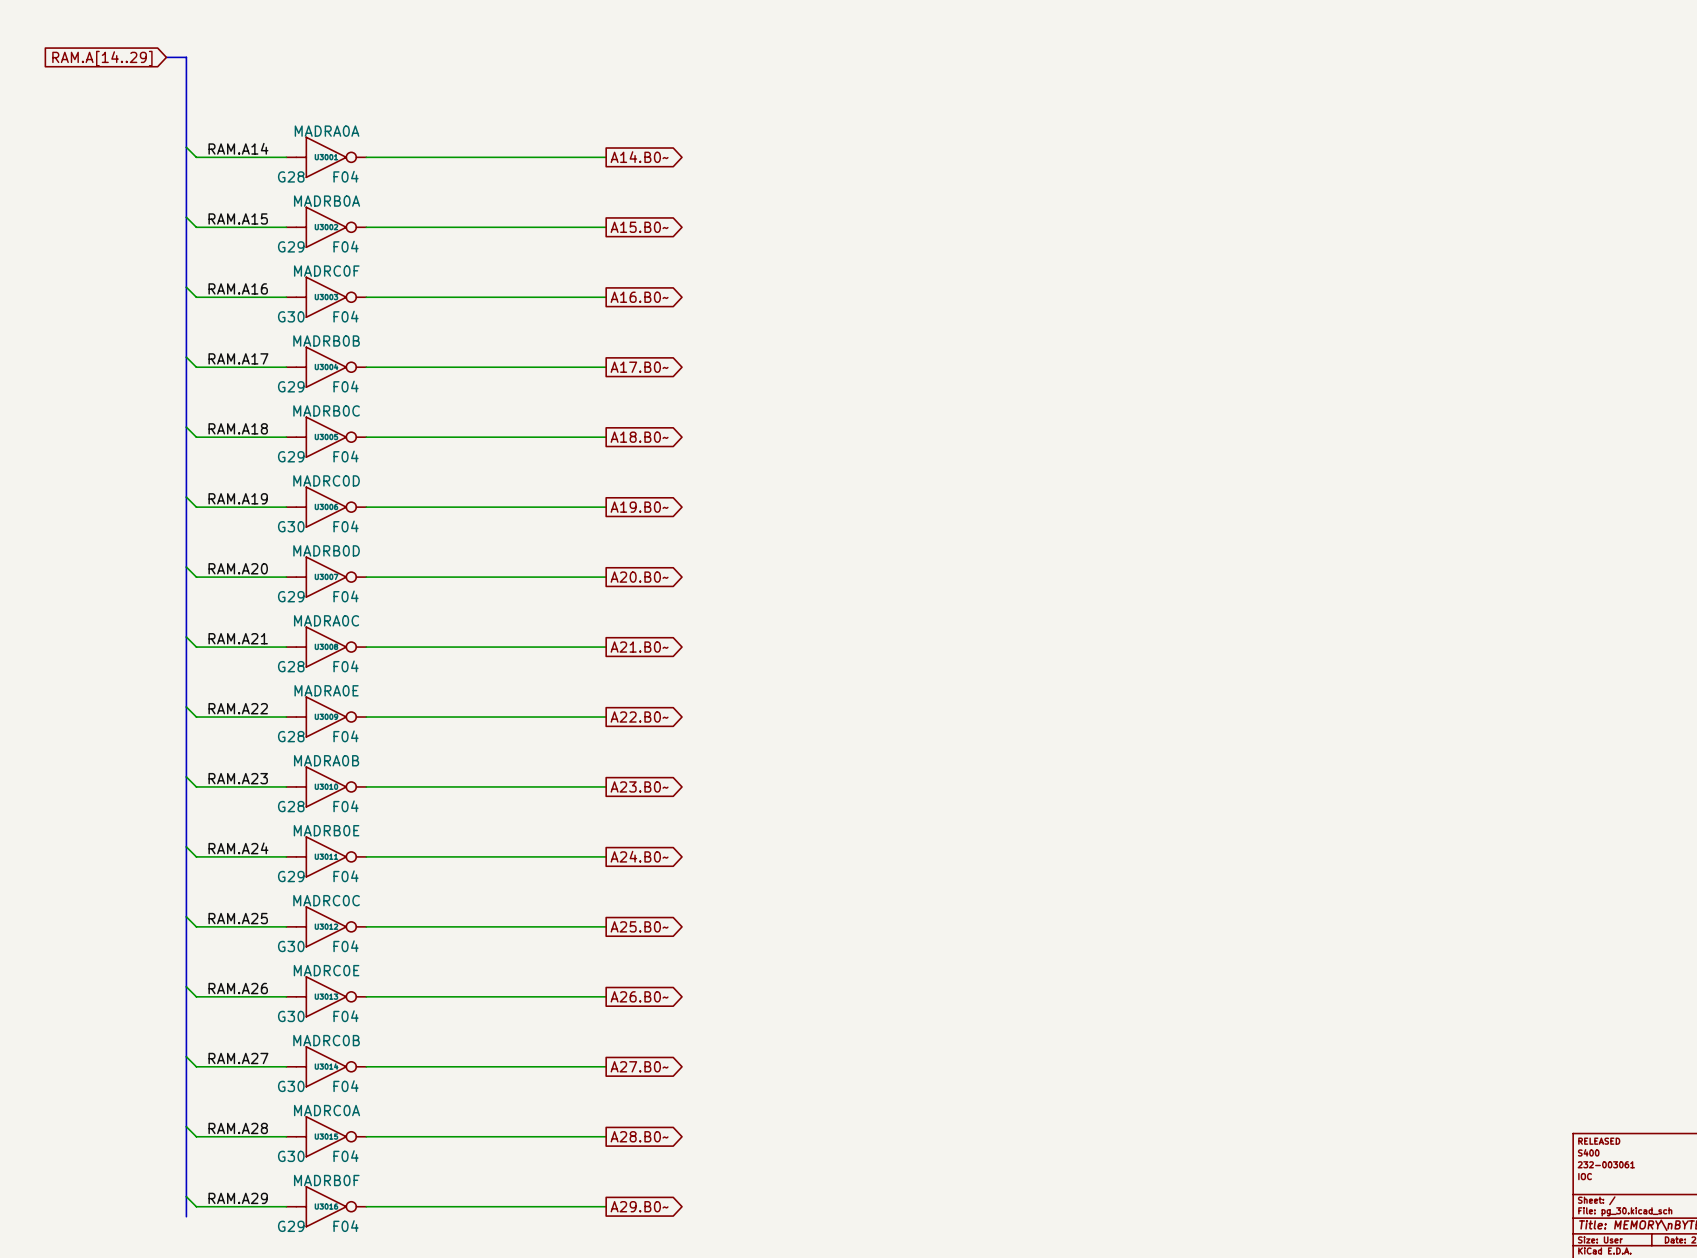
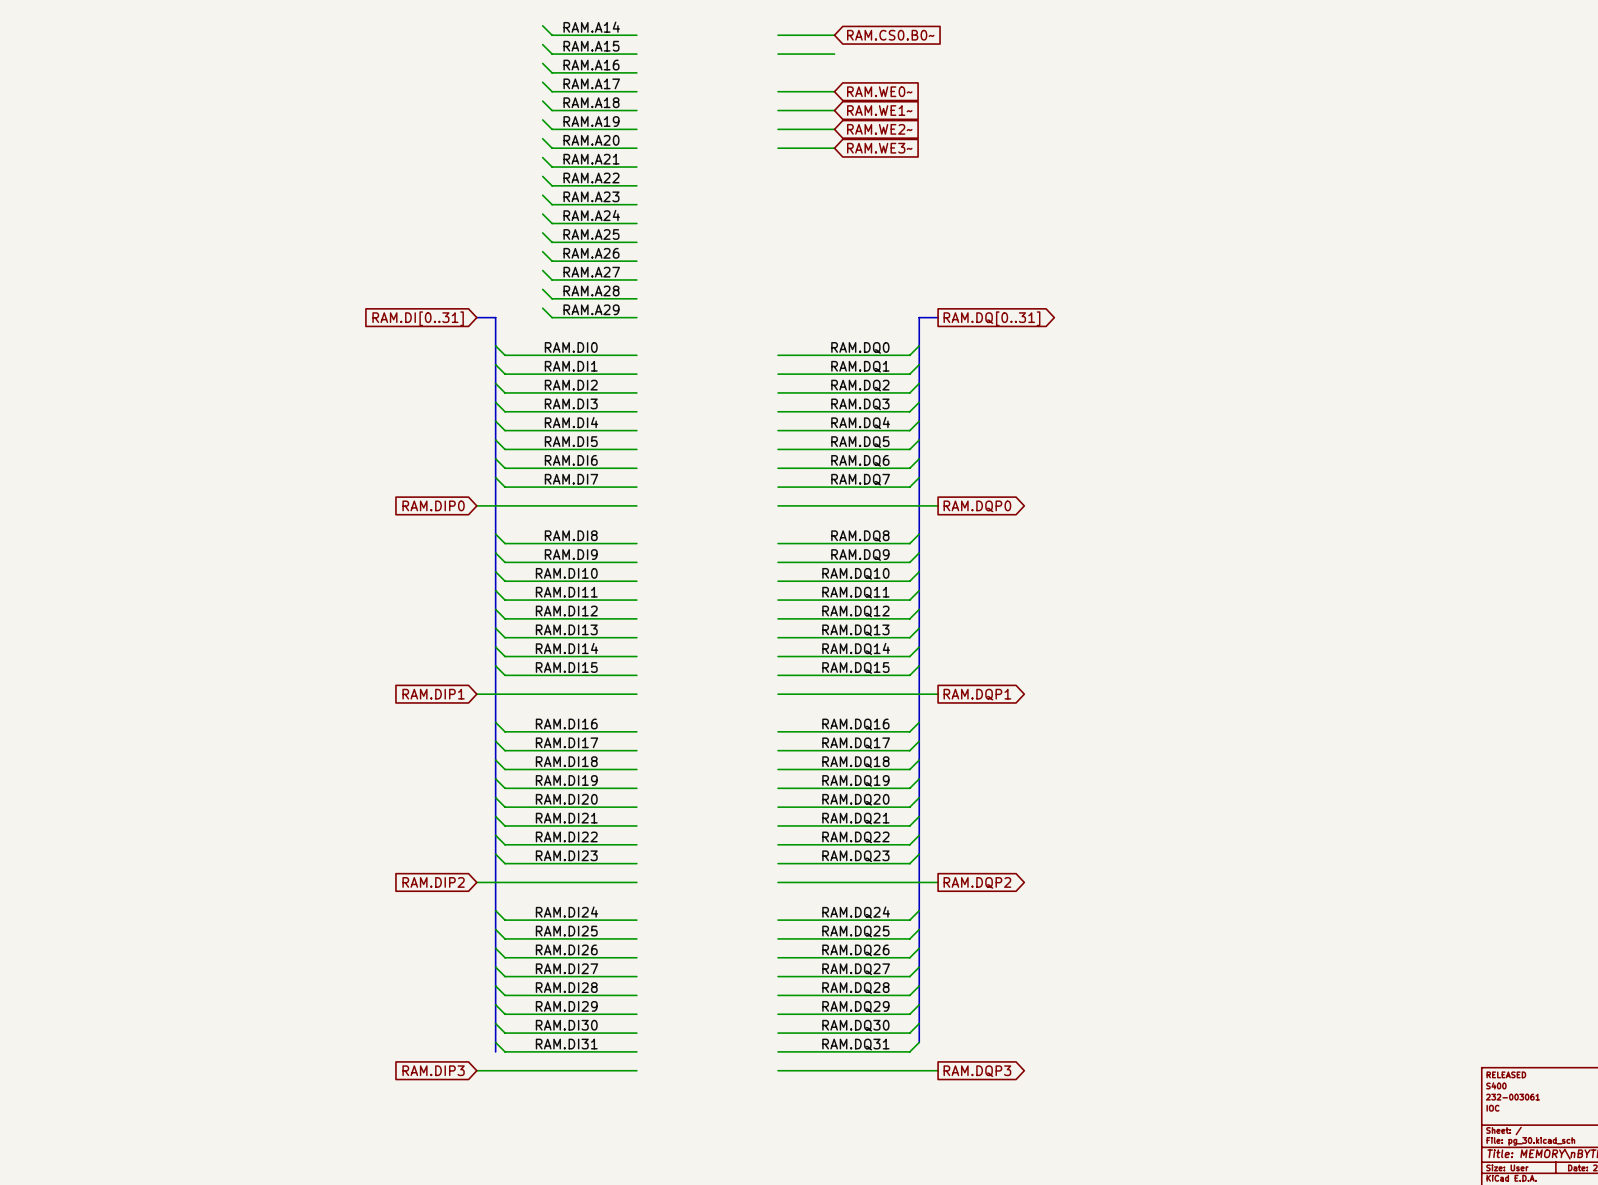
wire: none -> (542, 25) (552, 35) (636, 35)
label: none -> RAM.A14 (591, 27)
wire: none -> (778, 35) (834, 35)
global label: none -> RAM.CS0.B0~ (890, 35)
wire: none -> (542, 44) (552, 54) (636, 54)
label: none -> RAM.A15 (591, 46)
bus: (166, 57) (186, 57) (186, 1216) -> none
wire: none -> (778, 54) (834, 54)
global label: RAM.A[14..29] (102, 58) -> none
wire: none -> (542, 63) (552, 72) (636, 72)
label: none -> RAM.A16 (591, 65)
wire: none -> (542, 82) (552, 91) (636, 91)
label: none -> RAM.A17 (591, 83)
wire: none -> (778, 91) (834, 91)
global label: none -> RAM.WE0~ (879, 91)
wire: none -> (542, 101) (552, 110) (636, 110)
label: none -> RAM.A18 (591, 102)
wire: none -> (778, 110) (834, 110)
global label: none -> RAM.WE1~ (879, 110)
wire: none -> (542, 119) (552, 129) (636, 129)
label: none -> RAM.A19 (591, 121)
wire: none -> (778, 129) (834, 129)
global label: none -> RAM.WE2~ (879, 129)
wire: (186, 147) (196, 157) (286, 157) -> none
label: RAM.A14 (238, 148) -> none
label: none -> RAM.A20 (591, 140)
part: F04 (326, 157) -> none
wire: (366, 157) (586, 157) -> (542, 138) (552, 148)
wire: none -> (570, 148) (636, 148)
global label: A14.B0~ (639, 157) -> none
wire: none -> (778, 148) (834, 148)
global label: none -> RAM.WE3~ (879, 148)
wire: none -> (542, 157) (552, 167) (636, 167)
label: none -> RAM.A21 (591, 159)
wire: none -> (542, 176) (552, 185) (636, 185)
label: none -> RAM.A22 (591, 178)
wire: none -> (542, 195) (552, 204) (636, 204)
label: none -> RAM.A23 (591, 196)
wire: (186, 217) (196, 227) (286, 227) -> none
label: RAM.A15 (238, 218) -> none
part: F04 (326, 227) -> none
wire: (366, 227) (606, 227) -> none
wire: none -> (542, 214) (552, 223) (636, 223)
global label: A15.B0~ (639, 227) -> none
label: none -> RAM.A24 (591, 215)
wire: none -> (542, 232) (552, 242) (636, 242)
label: none -> RAM.A25 (591, 234)
wire: none -> (542, 251) (552, 261) (636, 261)
label: none -> RAM.A26 (591, 253)
wire: (186, 287) (196, 297) (286, 297) -> none
label: RAM.A16 (238, 288) -> none
label: none -> RAM.A27 (591, 272)
part: F04 (326, 297) -> none
wire: (366, 297) (586, 297) -> (542, 270) (552, 279)
wire: none -> (570, 279) (636, 279)
global label: A16.B0~ (639, 297) -> none
wire: none -> (542, 289) (552, 298) (636, 298)
label: none -> RAM.A28 (591, 290)
wire: none -> (542, 308) (552, 317) (636, 317)
label: none -> RAM.A29 (591, 309)
bus: none -> (476, 317) (495, 317) (495, 1051)
bus: none -> (938, 317) (919, 317) (919, 1042)
global label: none -> RAM.DI[0..31] (418, 318)
global label: none -> RAM.DQ[0..31] (991, 318)
wire: (186, 357) (196, 367) (286, 367) -> none
label: RAM.A17 (238, 358) -> none
part: F04 (326, 367) -> none
wire: (366, 367) (606, 367) -> none
wire: none -> (495, 345) (505, 355) (636, 355)
global label: A17.B0~ (639, 367) -> none
wire: none -> (919, 345) (909, 355) (778, 355)
label: none -> RAM.DI0 (571, 347)
label: none -> RAM.DQ0 (860, 347)
wire: none -> (495, 364) (505, 374) (636, 374)
wire: none -> (919, 364) (909, 374) (778, 374)
label: none -> RAM.DI1 (571, 366)
label: none -> RAM.DQ1 (860, 366)
wire: none -> (495, 383) (505, 392) (636, 392)
wire: none -> (919, 383) (909, 392) (778, 392)
label: none -> RAM.DI2 (571, 385)
label: none -> RAM.DQ2 (860, 385)
wire: (186, 427) (196, 437) (286, 437) -> none
wire: none -> (919, 402) (909, 411) (778, 411)
label: RAM.A18 (238, 428) -> none
label: none -> RAM.DI3 (571, 403)
label: none -> RAM.DQ3 (860, 404)
part: F04 (326, 437) -> none
wire: (366, 437) (536, 437) -> (495, 402) (505, 411)
wire: none -> (570, 411) (636, 411)
global label: A18.B0~ (639, 437) -> none
wire: none -> (495, 421) (505, 430) (636, 430)
wire: none -> (919, 421) (909, 430) (778, 430)
label: none -> RAM.DI4 (571, 422)
label: none -> RAM.DQ4 (860, 422)
wire: none -> (495, 440) (505, 449) (636, 449)
wire: none -> (919, 440) (909, 449) (778, 449)
label: none -> RAM.DI5 (571, 441)
label: none -> RAM.DQ5 (860, 442)
wire: none -> (495, 458) (505, 468) (636, 468)
wire: none -> (919, 458) (909, 468) (778, 468)
label: none -> RAM.DI6 (571, 460)
label: none -> RAM.DQ6 (860, 460)
wire: (186, 497) (196, 507) (286, 507) -> none
label: RAM.A19 (238, 498) -> none
part: F04 (326, 507) -> none
wire: (366, 507) (606, 507) -> none
wire: none -> (495, 477) (505, 487) (636, 487)
global label: A19.B0~ (639, 507) -> none
wire: none -> (919, 477) (909, 487) (778, 487)
label: none -> RAM.DI7 (571, 479)
label: none -> RAM.DQ7 (860, 479)
global label: none -> RAM.DIP0 (433, 505)
wire: none -> (476, 505) (636, 505)
wire: none -> (778, 505) (938, 505)
global label: none -> RAM.DQP0 (977, 506)
wire: (186, 567) (196, 577) (286, 577) -> none
wire: none -> (919, 534) (909, 543) (778, 543)
label: RAM.A20 (238, 568) -> none
label: none -> RAM.DI8 (571, 535)
label: none -> RAM.DQ8 (860, 536)
part: F04 (326, 577) -> none
wire: (366, 577) (536, 577) -> (495, 534) (505, 543)
wire: none -> (570, 543) (636, 543)
global label: A20.B0~ (639, 577) -> none
wire: none -> (495, 552) (505, 562) (636, 562)
wire: none -> (919, 552) (909, 562) (778, 562)
label: none -> RAM.DI9 (571, 554)
label: none -> RAM.DQ9 (860, 555)
wire: none -> (495, 571) (505, 581) (636, 581)
wire: none -> (919, 571) (909, 581) (778, 581)
label: none -> RAM.DI10 (566, 573)
label: none -> RAM.DQ10 (855, 573)
wire: none -> (495, 590) (505, 600) (636, 600)
wire: none -> (919, 590) (909, 600) (778, 600)
label: none -> RAM.DI11 (566, 592)
label: none -> RAM.DQ11 (855, 592)
wire: (186, 637) (196, 647) (286, 647) -> none
label: RAM.A21 (238, 638) -> none
part: F04 (326, 647) -> none
wire: (366, 647) (606, 647) -> none
wire: none -> (495, 609) (505, 618) (636, 618)
global label: A21.B0~ (639, 647) -> none
wire: none -> (919, 609) (909, 618) (778, 618)
label: none -> RAM.DI12 (566, 611)
label: none -> RAM.DQ12 (855, 611)
wire: none -> (495, 628) (505, 637) (636, 637)
wire: none -> (919, 628) (909, 637) (778, 637)
label: none -> RAM.DI13 (566, 629)
label: none -> RAM.DQ13 (855, 630)
wire: none -> (495, 647) (505, 656) (636, 656)
wire: none -> (919, 647) (909, 656) (778, 656)
label: none -> RAM.DI14 (566, 648)
label: none -> RAM.DQ14 (856, 648)
wire: (186, 707) (196, 717) (286, 717) -> none
wire: none -> (919, 665) (909, 675) (778, 675)
label: RAM.A22 (238, 708) -> none
label: none -> RAM.DI15 (566, 667)
label: none -> RAM.DQ15 (855, 667)
part: F04 (326, 717) -> none
wire: (366, 717) (536, 717) -> (495, 665) (505, 675)
wire: none -> (570, 675) (636, 675)
global label: A22.B0~ (639, 717) -> none
global label: none -> RAM.DIP1 (433, 694)
wire: none -> (476, 694) (636, 694)
wire: none -> (778, 694) (938, 694)
global label: none -> RAM.DQP1 (977, 694)
wire: none -> (495, 722) (505, 731) (636, 731)
wire: none -> (919, 722) (909, 731) (778, 731)
label: none -> RAM.DI16 (566, 724)
label: none -> RAM.DQ16 (855, 724)
wire: (186, 776) (196, 786) (286, 786) -> none
label: RAM.A23 (238, 778) -> none
part: F04 (326, 786) -> none
wire: (366, 786) (606, 786) -> none
wire: none -> (495, 741) (505, 750) (636, 750)
global label: A23.B0~ (639, 786) -> none
wire: none -> (919, 741) (909, 750) (778, 750)
label: none -> RAM.DI17 (566, 742)
label: none -> RAM.DQ17 (856, 743)
wire: none -> (495, 760) (505, 769) (636, 769)
wire: none -> (919, 760) (909, 769) (778, 769)
label: none -> RAM.DI18 (566, 761)
label: none -> RAM.DQ18 (855, 762)
wire: none -> (495, 778) (505, 788) (636, 788)
wire: none -> (919, 778) (909, 788) (778, 788)
label: none -> RAM.DI19 (566, 780)
label: none -> RAM.DQ19 (855, 780)
wire: (186, 846) (196, 856) (286, 856) -> none
wire: none -> (919, 797) (909, 807) (778, 807)
label: RAM.A24 (238, 848) -> none
label: none -> RAM.DI20 (566, 799)
label: none -> RAM.DQ20 (855, 799)
part: F04 (326, 856) -> none
wire: (366, 856) (536, 856) -> (495, 797) (505, 807)
wire: none -> (570, 807) (636, 807)
global label: A24.B0~ (639, 856) -> none
wire: none -> (495, 816) (505, 825) (636, 825)
wire: none -> (919, 816) (909, 825) (778, 825)
label: none -> RAM.DI21 (566, 818)
label: none -> RAM.DQ21 (855, 818)
wire: none -> (495, 835) (505, 844) (636, 844)
wire: none -> (919, 835) (909, 844) (778, 844)
label: none -> RAM.DI22 (566, 836)
label: none -> RAM.DQ22 (855, 837)
wire: none -> (495, 854) (505, 863) (636, 863)
wire: none -> (919, 854) (909, 863) (778, 863)
label: none -> RAM.DI23 (566, 855)
label: none -> RAM.DQ23 (855, 856)
wire: (186, 916) (196, 926) (286, 926) -> none
label: RAM.A25 (238, 918) -> none
part: F04 (326, 926) -> none
wire: (366, 926) (606, 926) -> none
global label: A25.B0~ (639, 926) -> none
global label: none -> RAM.DIP2 (433, 882)
wire: none -> (476, 882) (636, 882)
wire: none -> (778, 882) (938, 882)
global label: none -> RAM.DQP2 (977, 882)
wire: none -> (495, 910) (505, 920) (636, 920)
wire: none -> (919, 910) (909, 920) (778, 920)
label: none -> RAM.DI24 (566, 912)
label: none -> RAM.DQ24 (856, 912)
wire: (186, 986) (196, 996) (286, 996) -> none
wire: none -> (919, 929) (909, 938) (778, 938)
label: RAM.A26 (238, 988) -> none
label: none -> RAM.DI25 (566, 931)
label: none -> RAM.DQ25 (855, 931)
part: F04 (326, 996) -> none
wire: (366, 996) (536, 996) -> (495, 929) (505, 938)
wire: none -> (570, 938) (636, 938)
global label: A26.B0~ (639, 996) -> none
wire: none -> (495, 948) (505, 957) (636, 957)
wire: none -> (919, 948) (909, 957) (778, 957)
label: none -> RAM.DI26 (566, 949)
label: none -> RAM.DQ26 (855, 950)
wire: none -> (495, 967) (505, 976) (636, 976)
wire: none -> (919, 967) (909, 976) (778, 976)
label: none -> RAM.DI27 (566, 968)
label: none -> RAM.DQ27 (856, 969)
wire: none -> (495, 986) (505, 995) (636, 995)
wire: none -> (919, 986) (909, 995) (778, 995)
label: none -> RAM.DI28 (566, 987)
label: none -> RAM.DQ28 (855, 988)
wire: (186, 1056) (196, 1066) (286, 1066) -> none
label: RAM.A27 (238, 1058) -> none
part: F04 (326, 1066) -> none
wire: (366, 1066) (606, 1066) -> none
wire: none -> (495, 1004) (505, 1014) (636, 1014)
global label: A27.B0~ (639, 1066) -> none
wire: none -> (919, 1004) (909, 1014) (778, 1014)
label: none -> RAM.DI29 (566, 1006)
label: none -> RAM.DQ29 (855, 1006)
wire: none -> (495, 1023) (505, 1033) (636, 1033)
wire: none -> (919, 1023) (909, 1033) (778, 1033)
label: none -> RAM.DI30 (566, 1025)
label: none -> RAM.DQ30 (855, 1025)
wire: none -> (495, 1042) (505, 1051) (636, 1051)
wire: none -> (919, 1042) (909, 1051) (778, 1051)
label: none -> RAM.DI31 (566, 1044)
label: none -> RAM.DQ31 (855, 1044)
wire: (186, 1126) (196, 1136) (286, 1136) -> none
label: RAM.A28 (238, 1128) -> none
part: F04 (326, 1136) -> none
wire: (366, 1136) (506, 1136) -> none
global label: none -> RAM.DIP3 (433, 1070)
wire: none -> (570, 1070) (636, 1070)
global label: A28.B0~ (639, 1136) -> none
wire: none -> (778, 1070) (938, 1070)
global label: none -> RAM.DQP3 (977, 1071)
wire: (186, 1196) (196, 1206) (286, 1206) -> none
label: RAM.A29 (238, 1198) -> none
part: F04 (326, 1206) -> none
wire: (366, 1206) (606, 1206) -> none
global label: A29.B0~ (639, 1206) -> none

